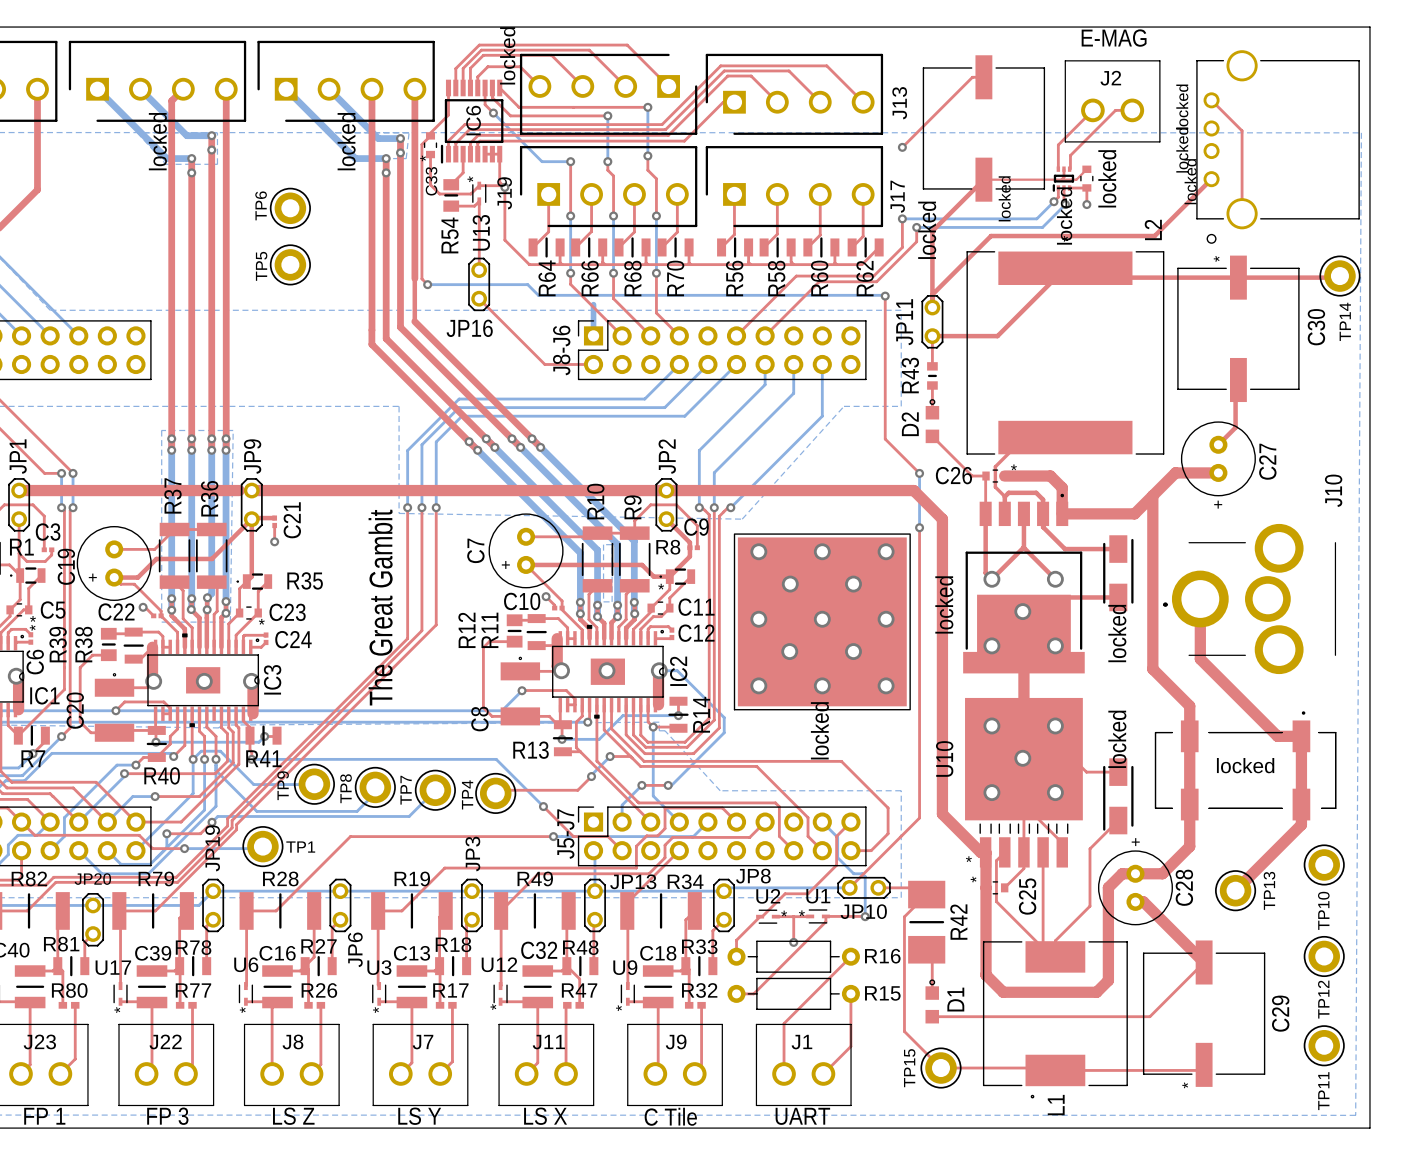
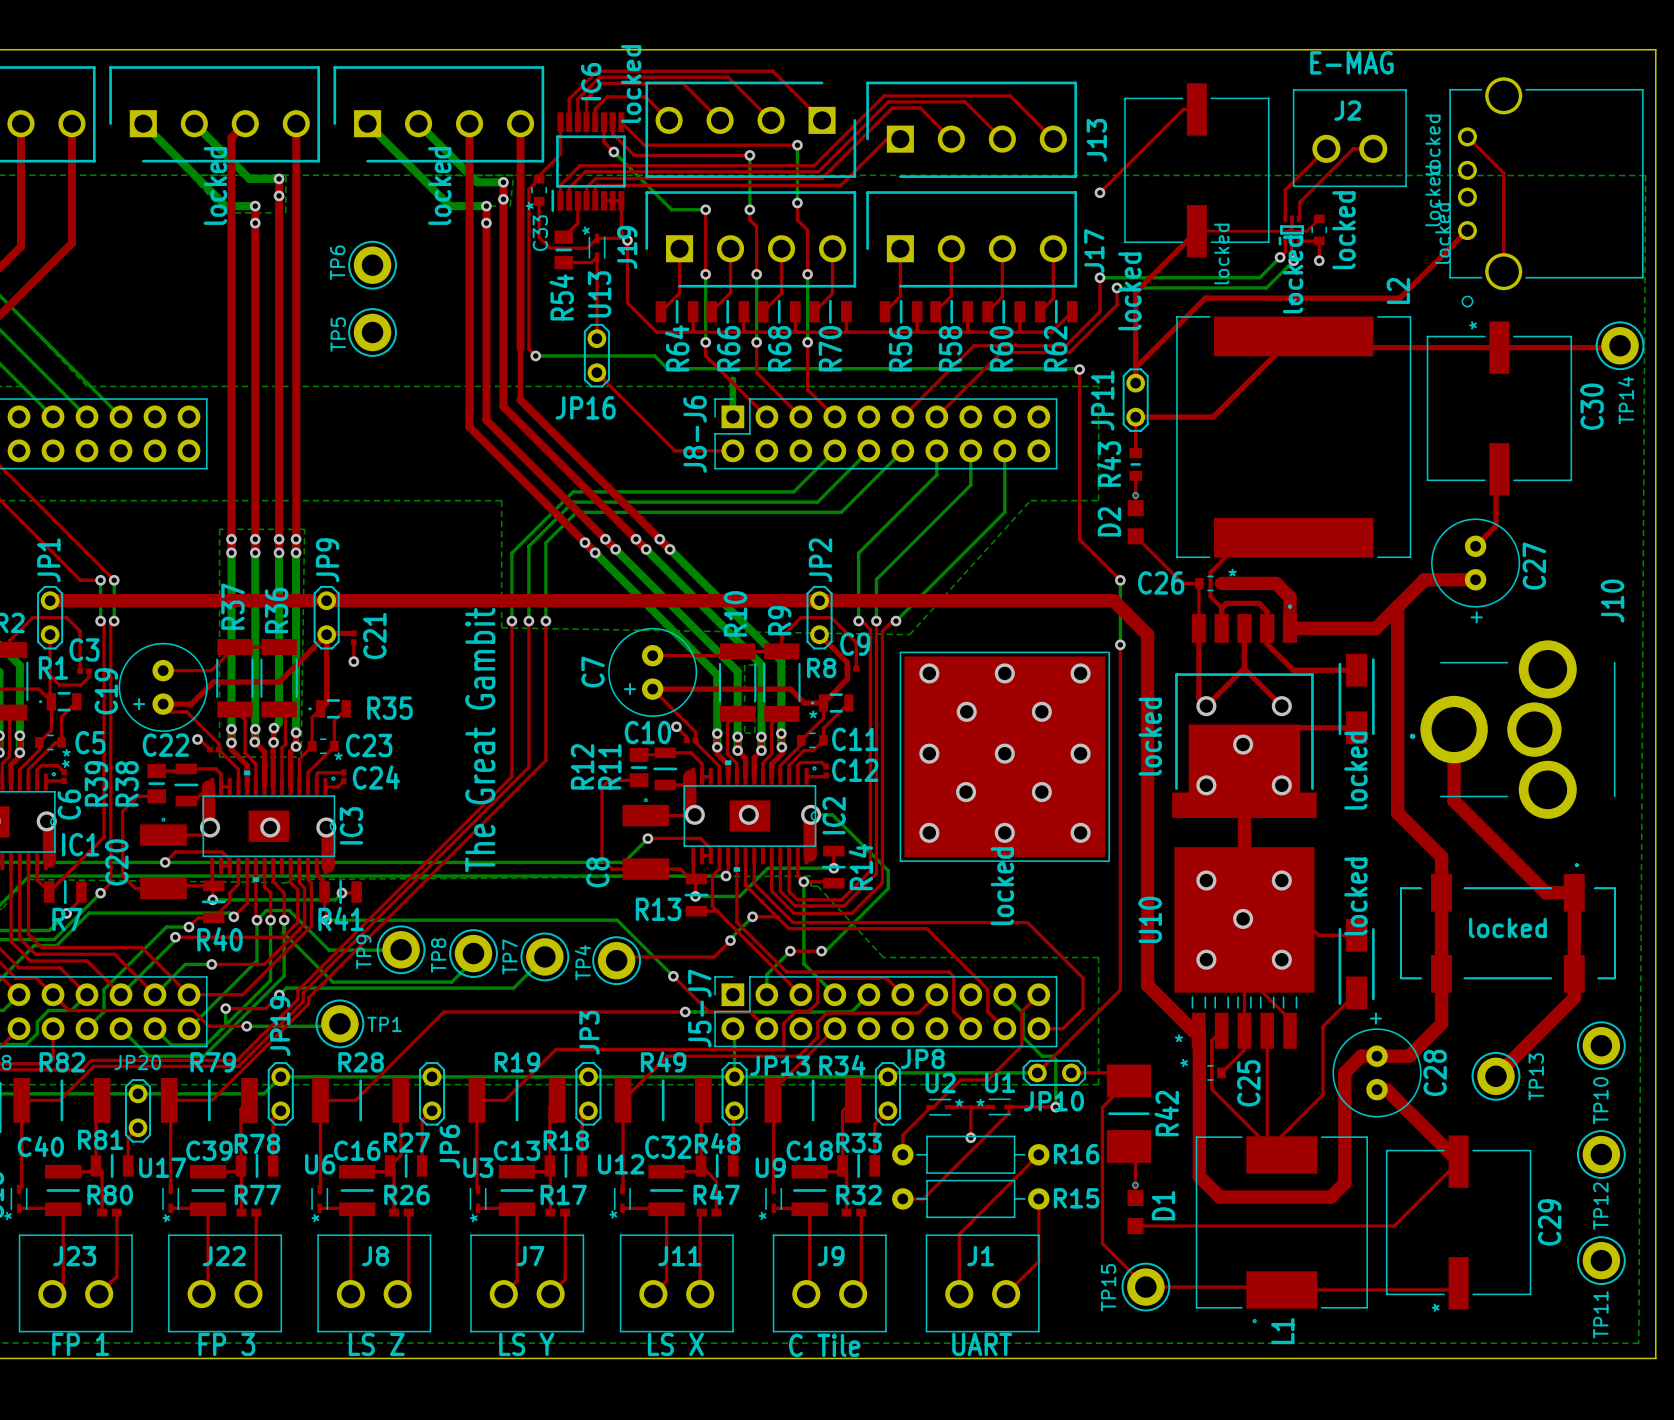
IC6 name position: IC6 (473, 120) -> IC6 (591, 81)

